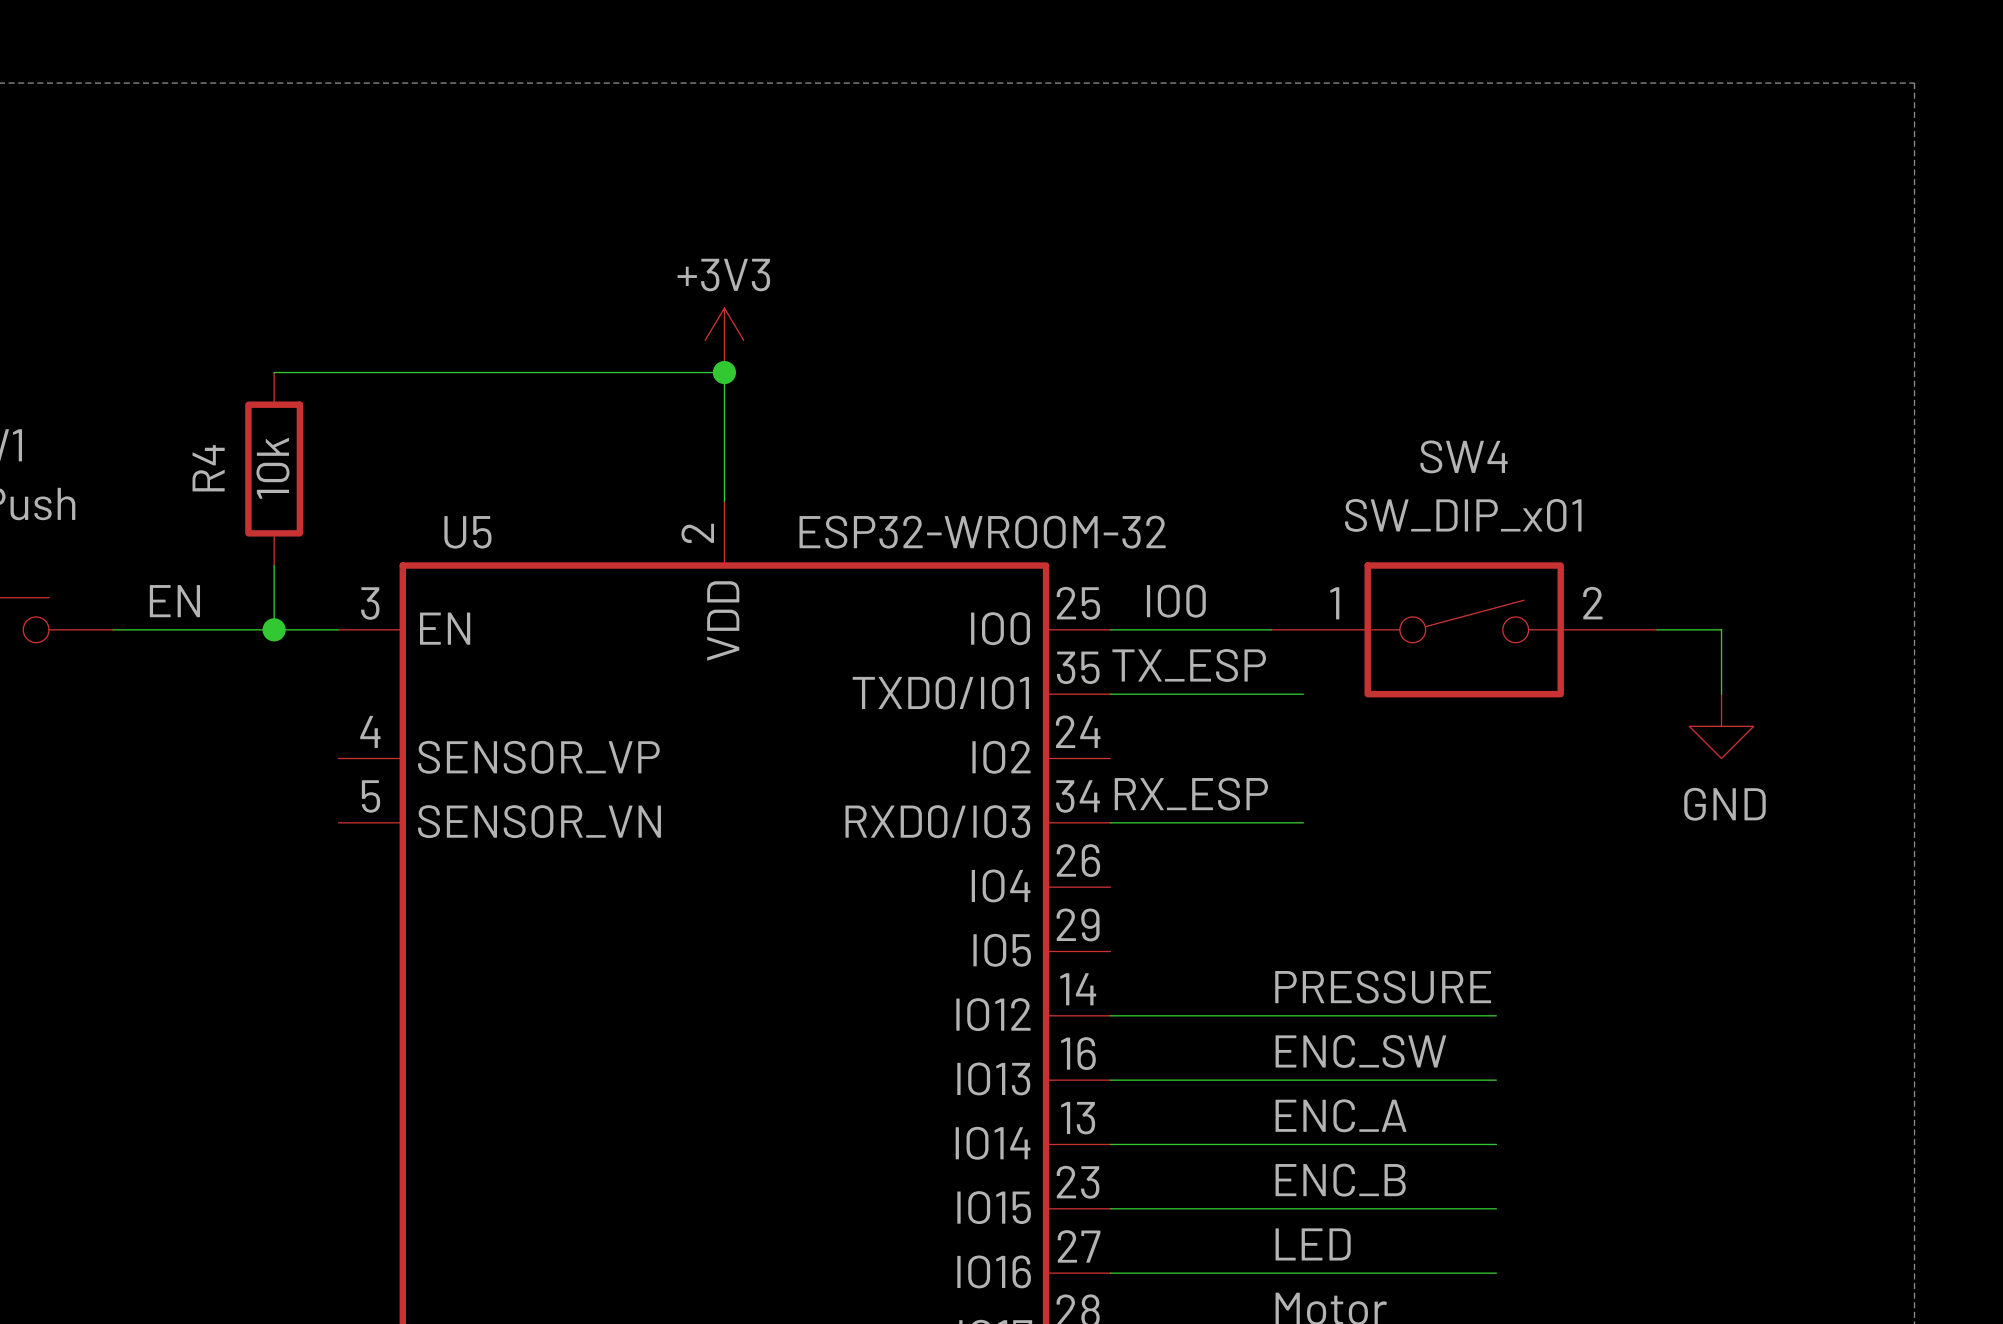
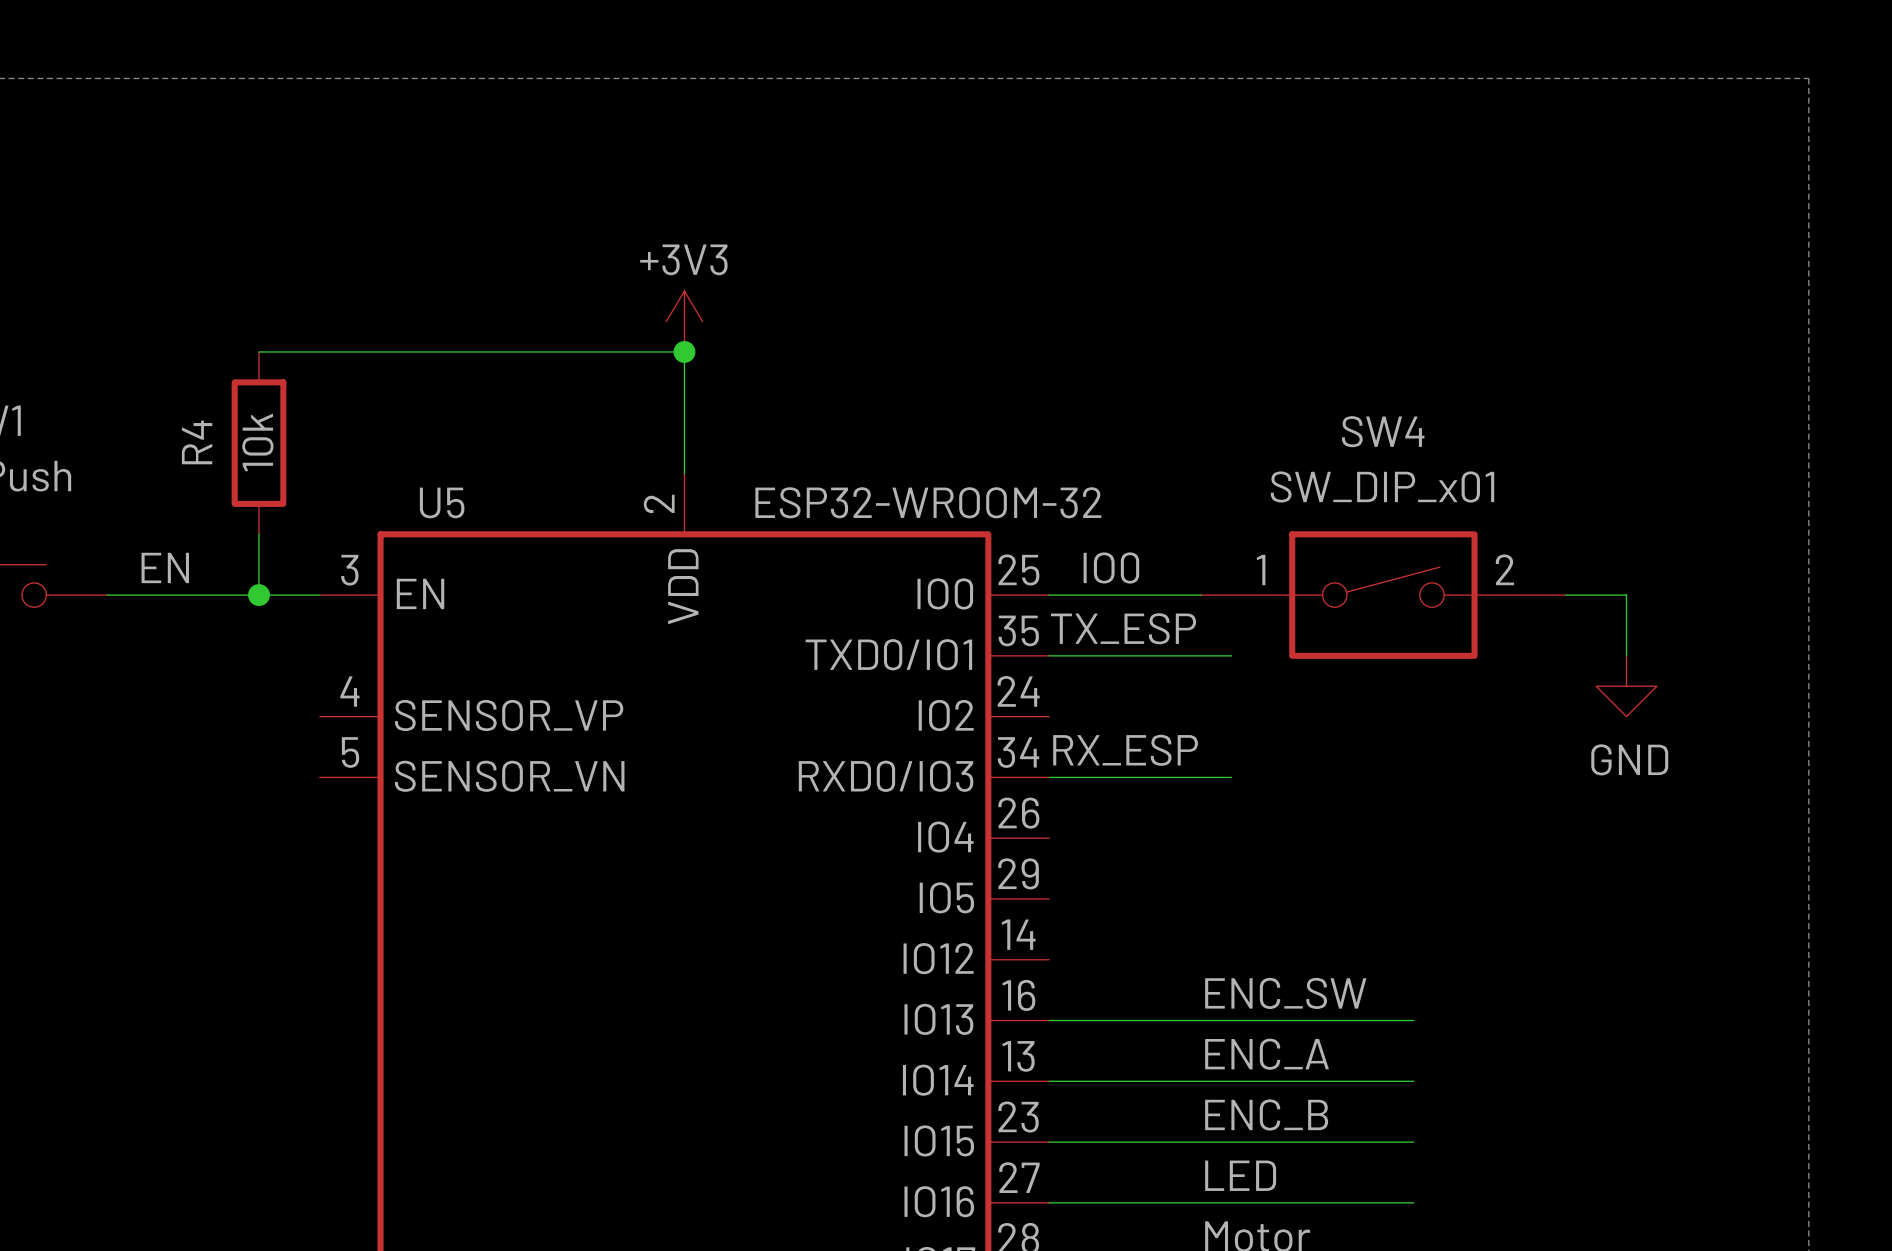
label: PRESSURE (1383, 987) -> none
wire: (1110, 1015) (1496, 1015) -> none

